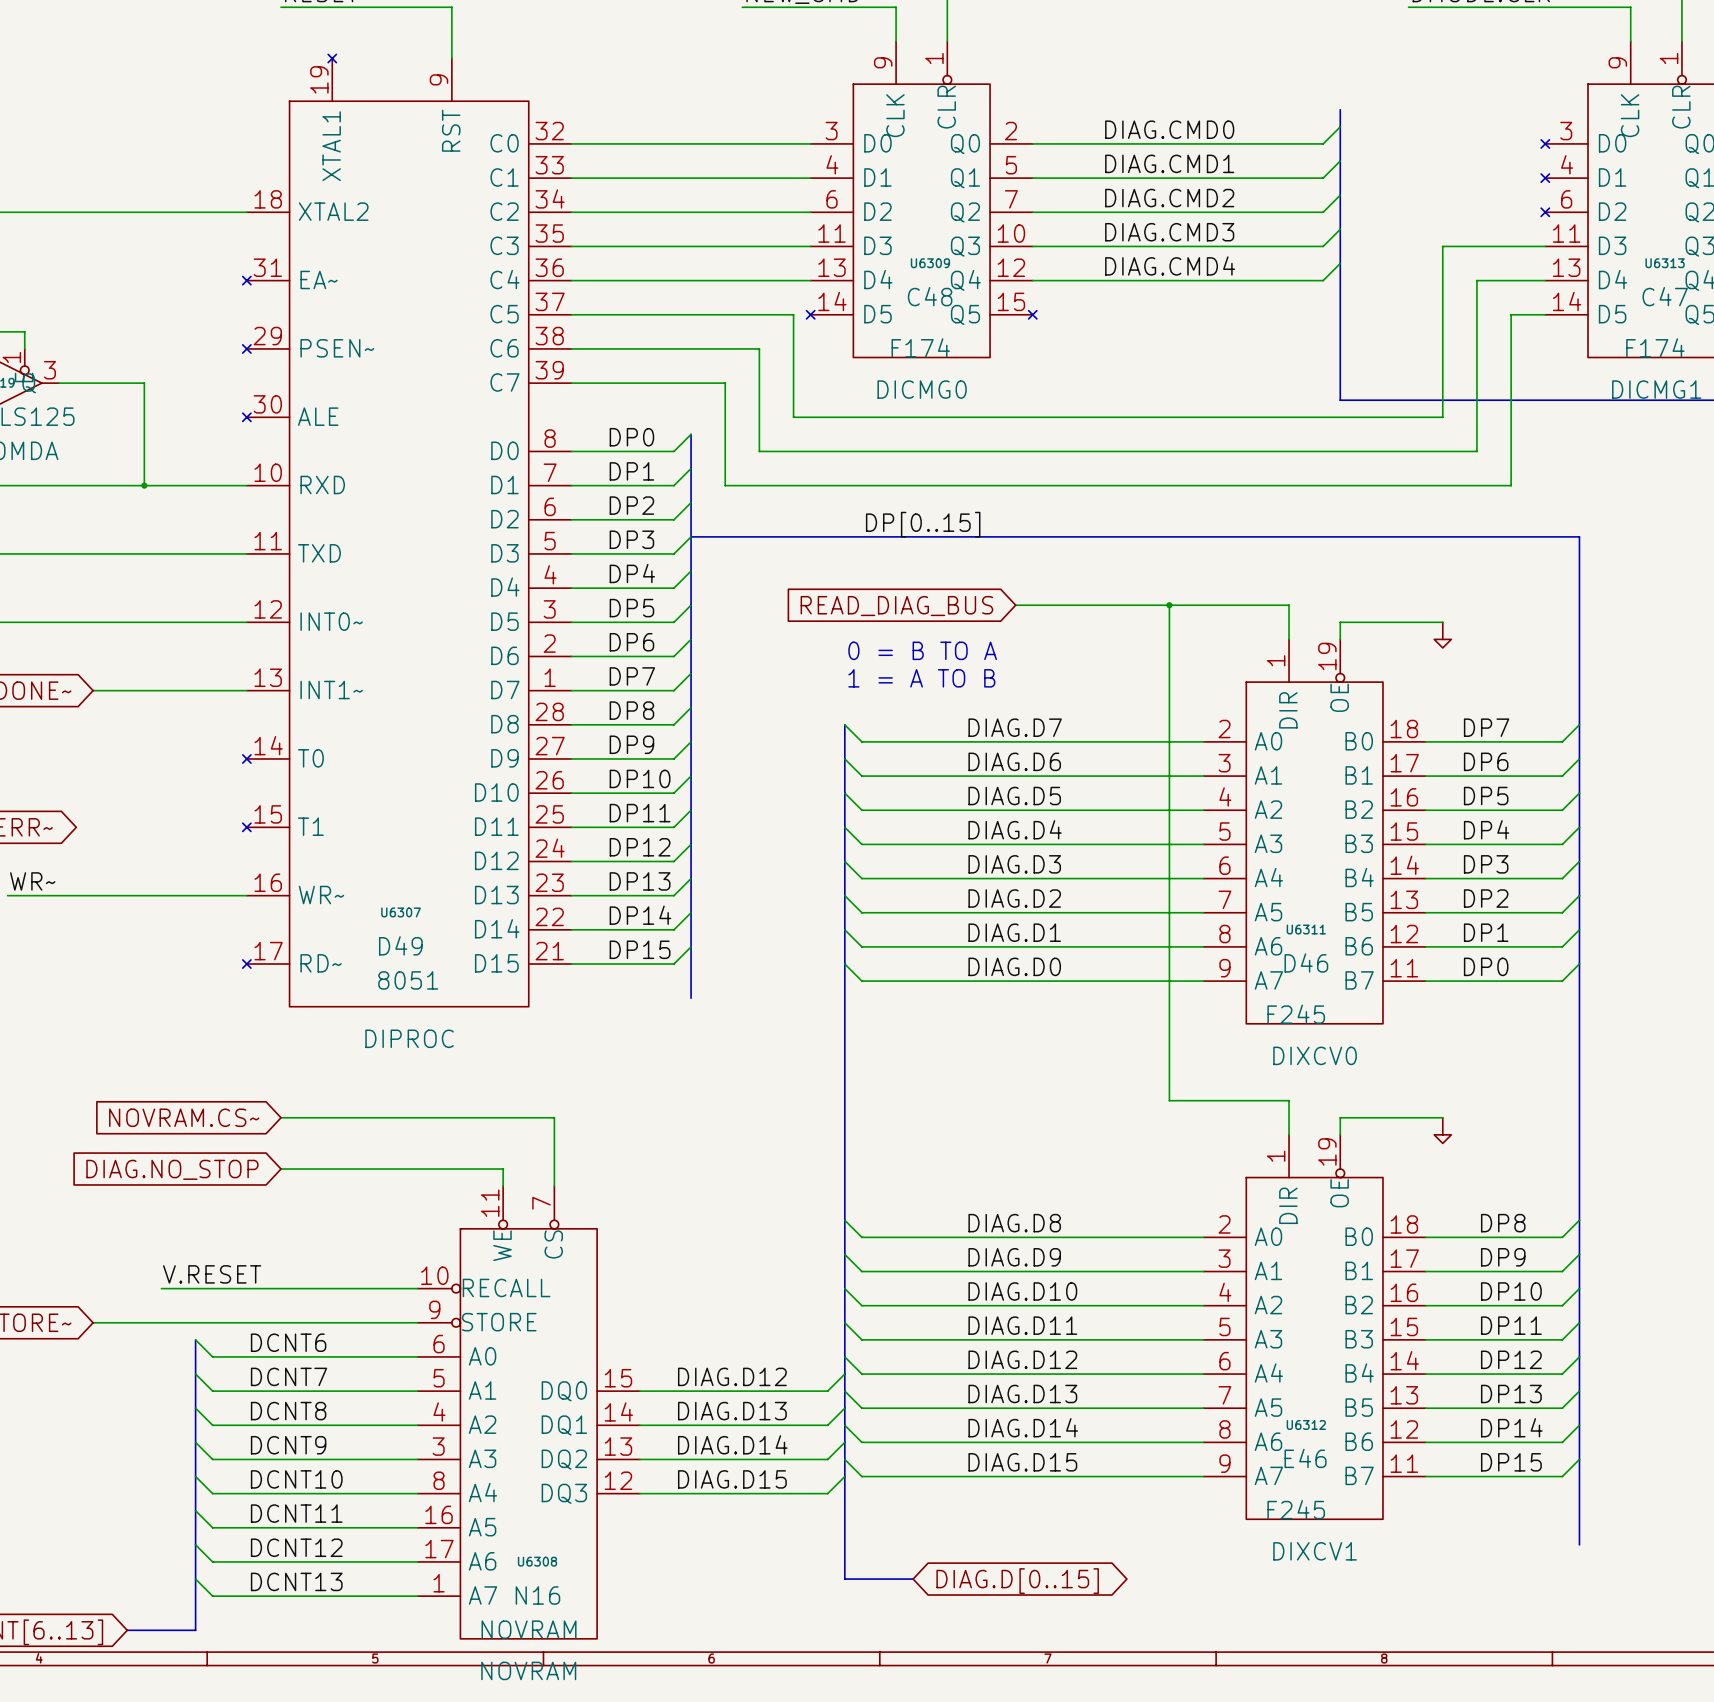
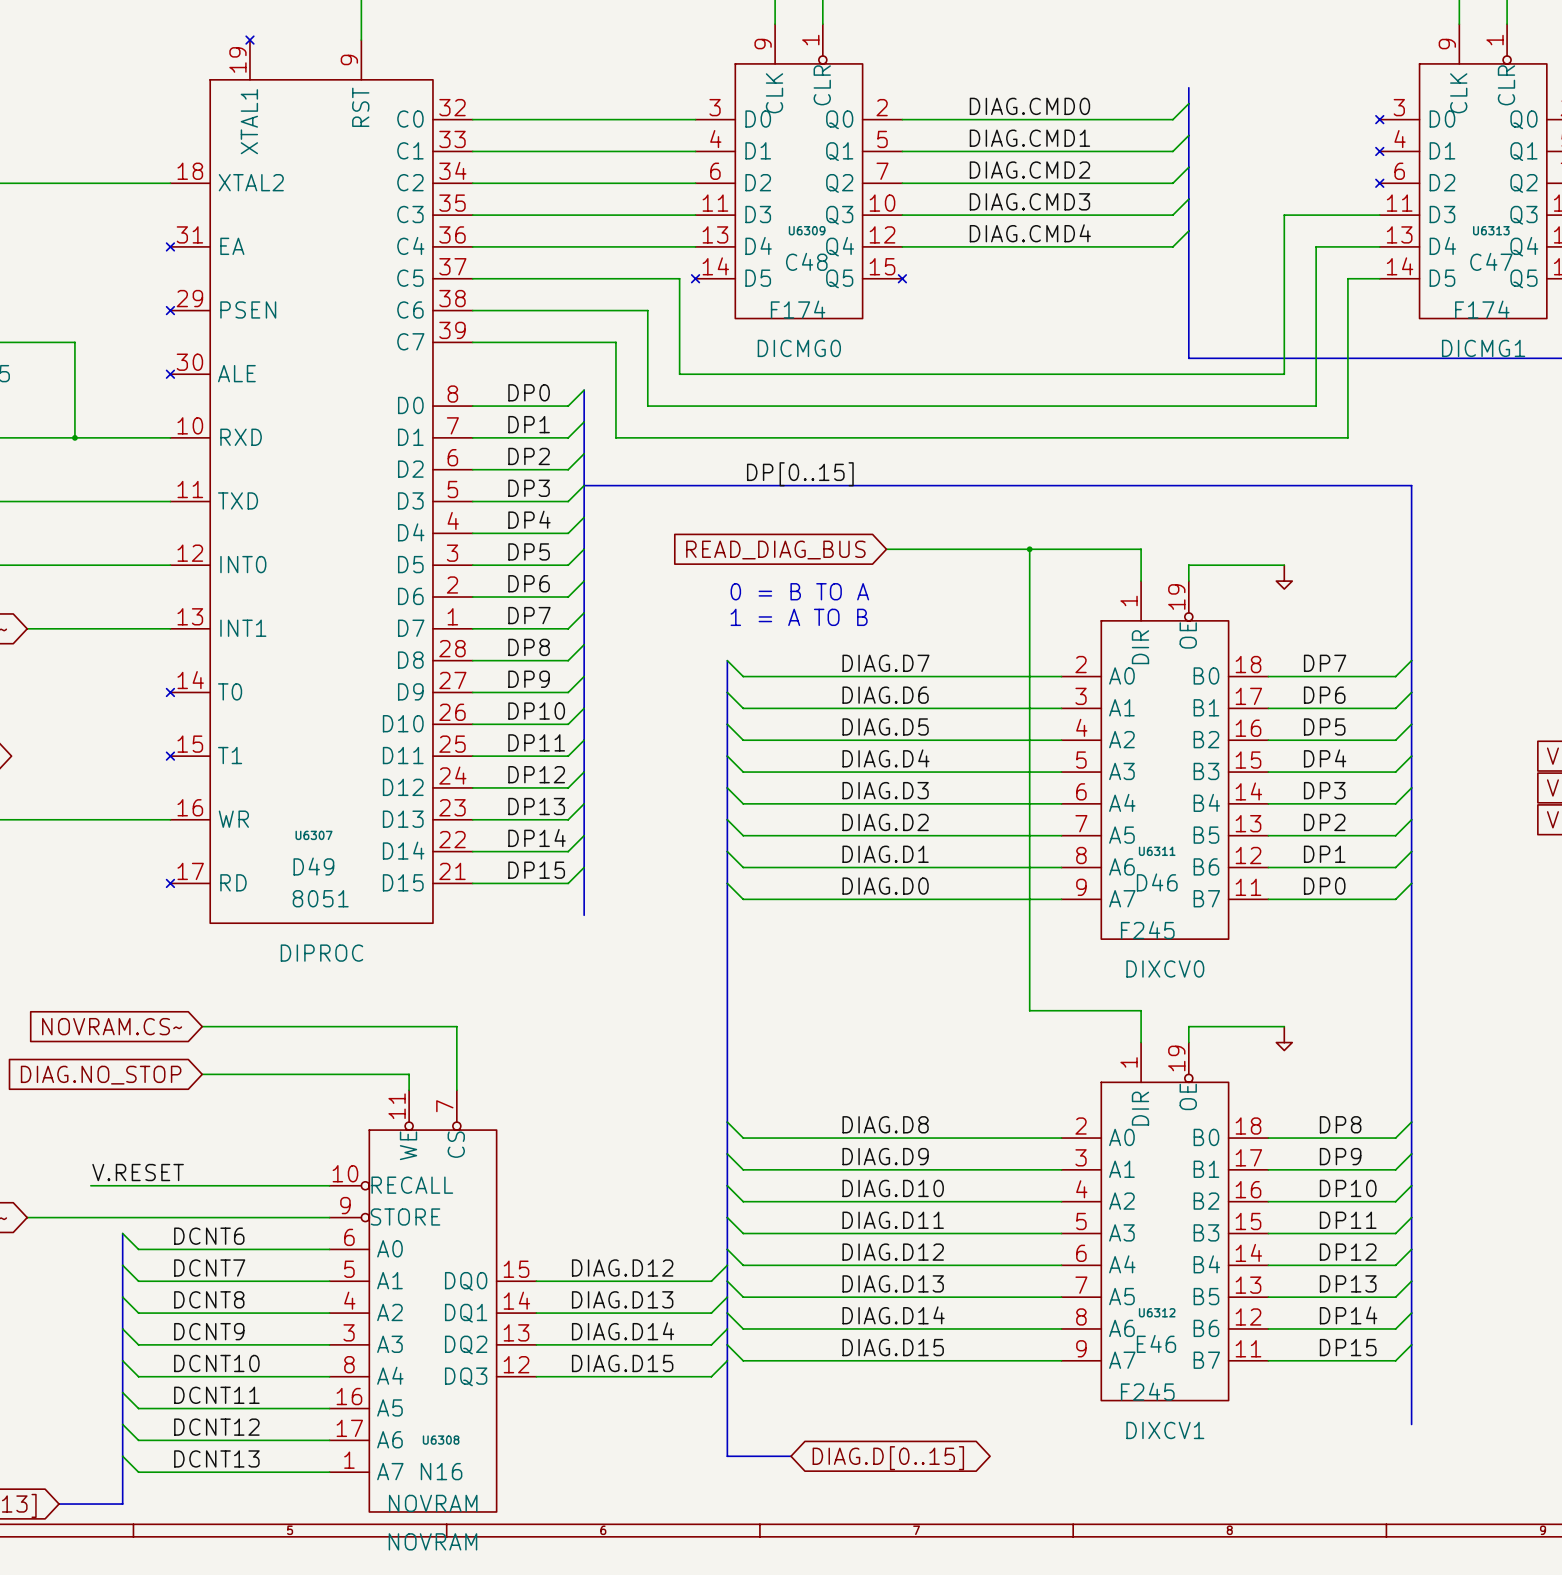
U6307 pin name: EA~ (319, 279) -> EA (232, 246)
U6307 pin name: PSEN~ (337, 348) -> PSEN (248, 309)
U6307 pin name: INT0~ (331, 621) -> INT0 (243, 564)
U6307 pin name: INT1~ (331, 690) -> INT1 (243, 628)
U6307 pin name: WR~ (321, 895) -> WR (233, 819)
U6307 pin name: RD~ (321, 963) -> RD (233, 882)

